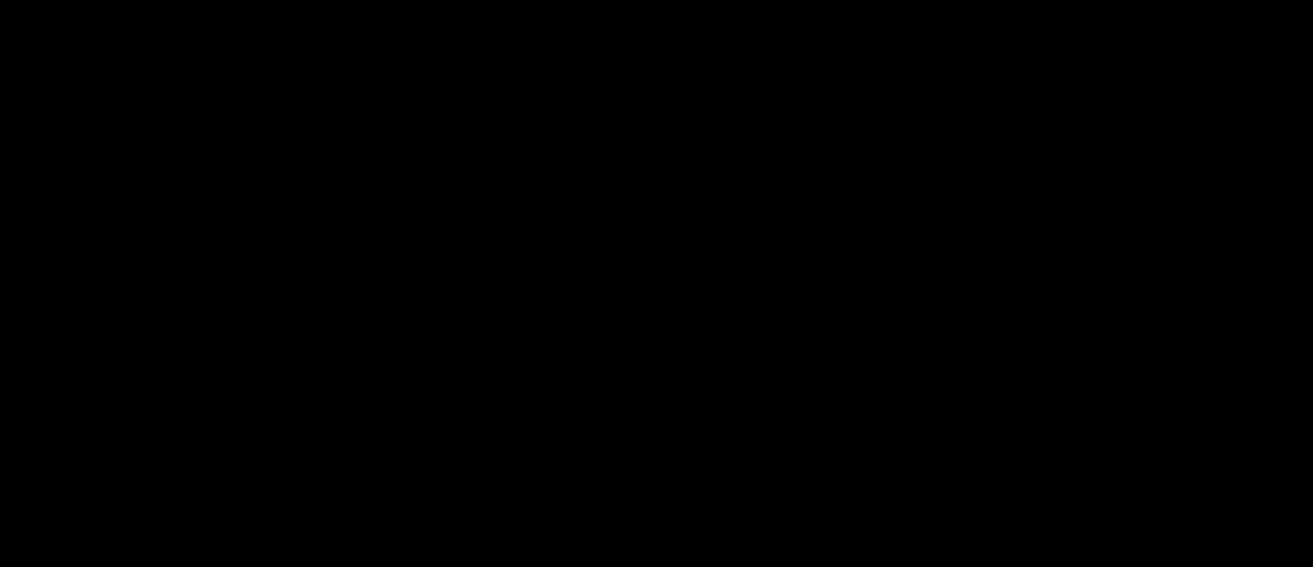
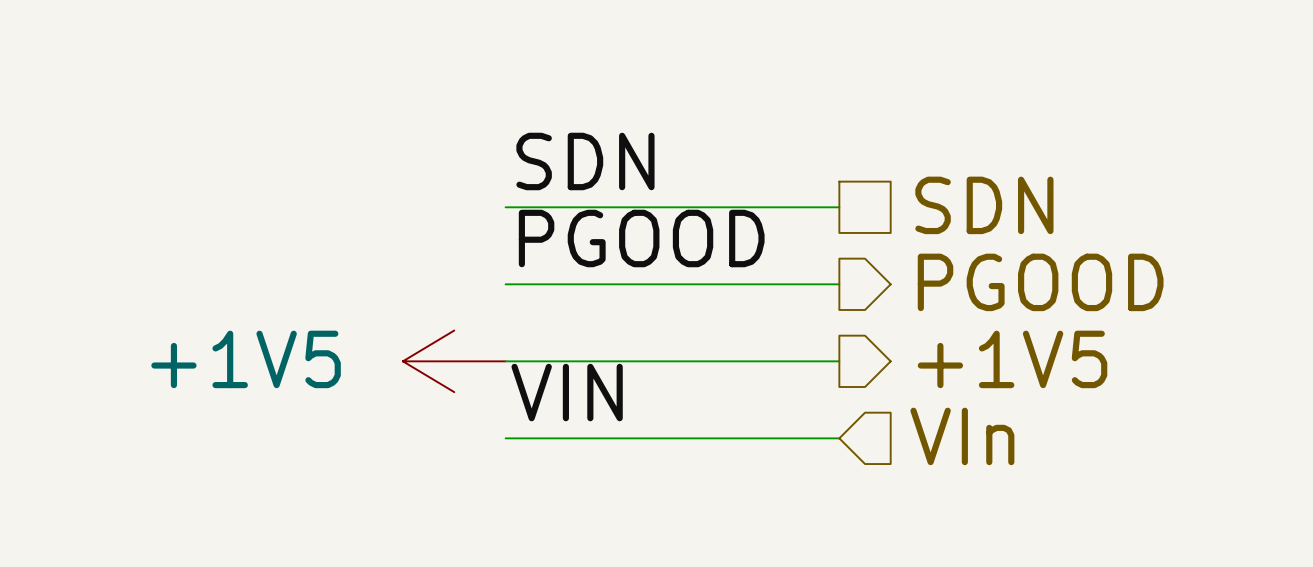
label: none -> SDN (585, 161)
hierarchical label: none -> SDN (984, 205)
wire: none -> (505, 207) (839, 207)
label: none -> PGOOD (641, 238)
hierarchical label: none -> PGOOD (1040, 282)
wire: none -> (505, 284) (839, 284)
hierarchical label: none -> +1V5 (1012, 359)
power symbol: none -> +1V5 (454, 361)
wire: none -> (505, 361) (839, 361)
label: none -> VIN (567, 392)
hierarchical label: none -> VIn (962, 436)
wire: none -> (505, 438) (839, 438)

